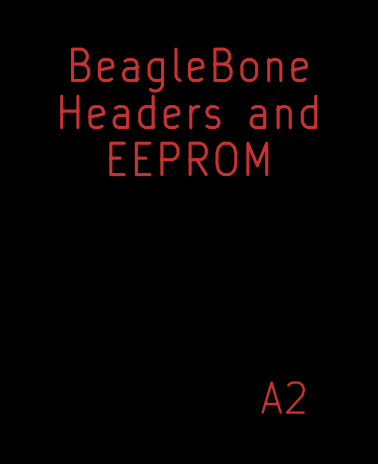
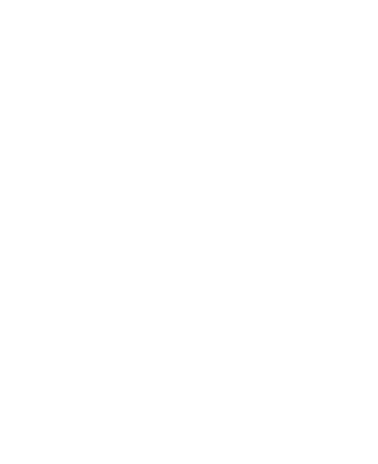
text: BeagleBone (189, 70) -> none
text: Headers and (188, 111) -> none
text: EEPROM (188, 158) -> none
text: A2 (283, 397) -> none

